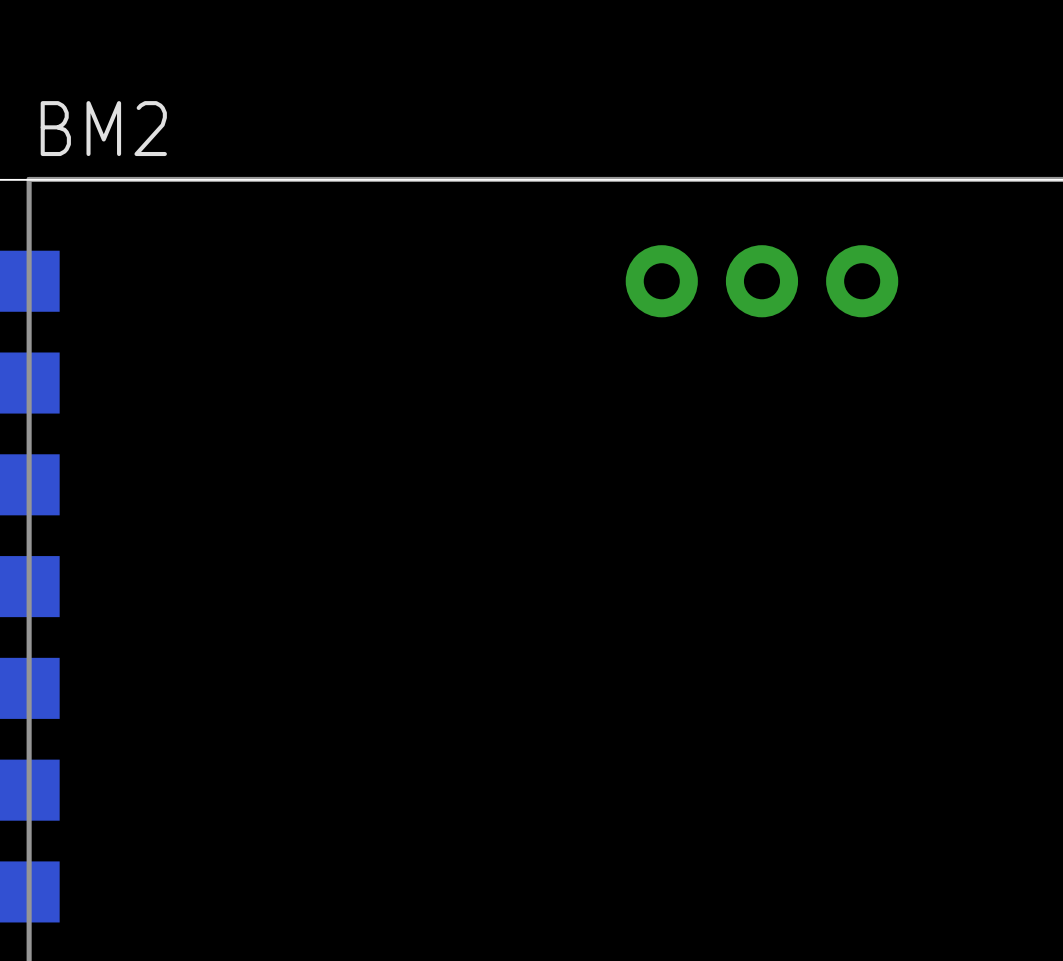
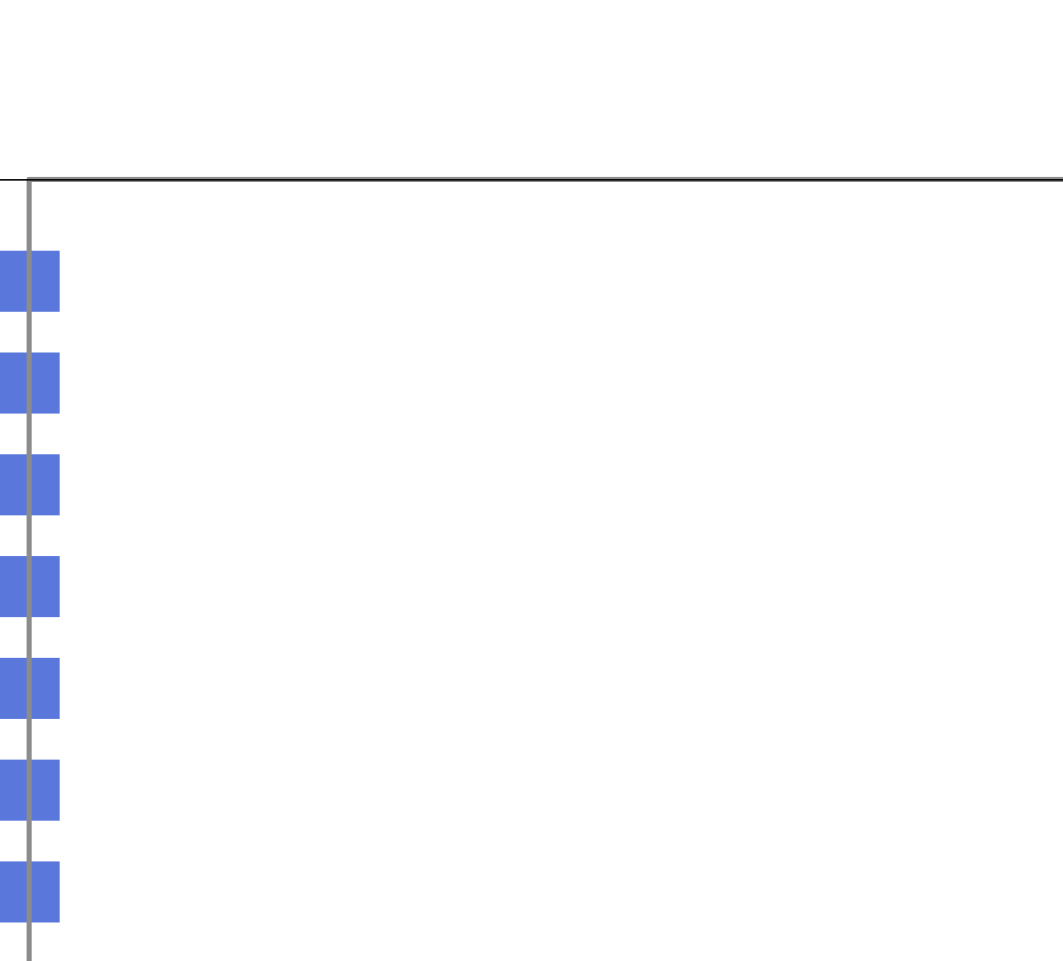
BM2 name: BM2 (103, 128) -> none
part: (761, 281) -> none

